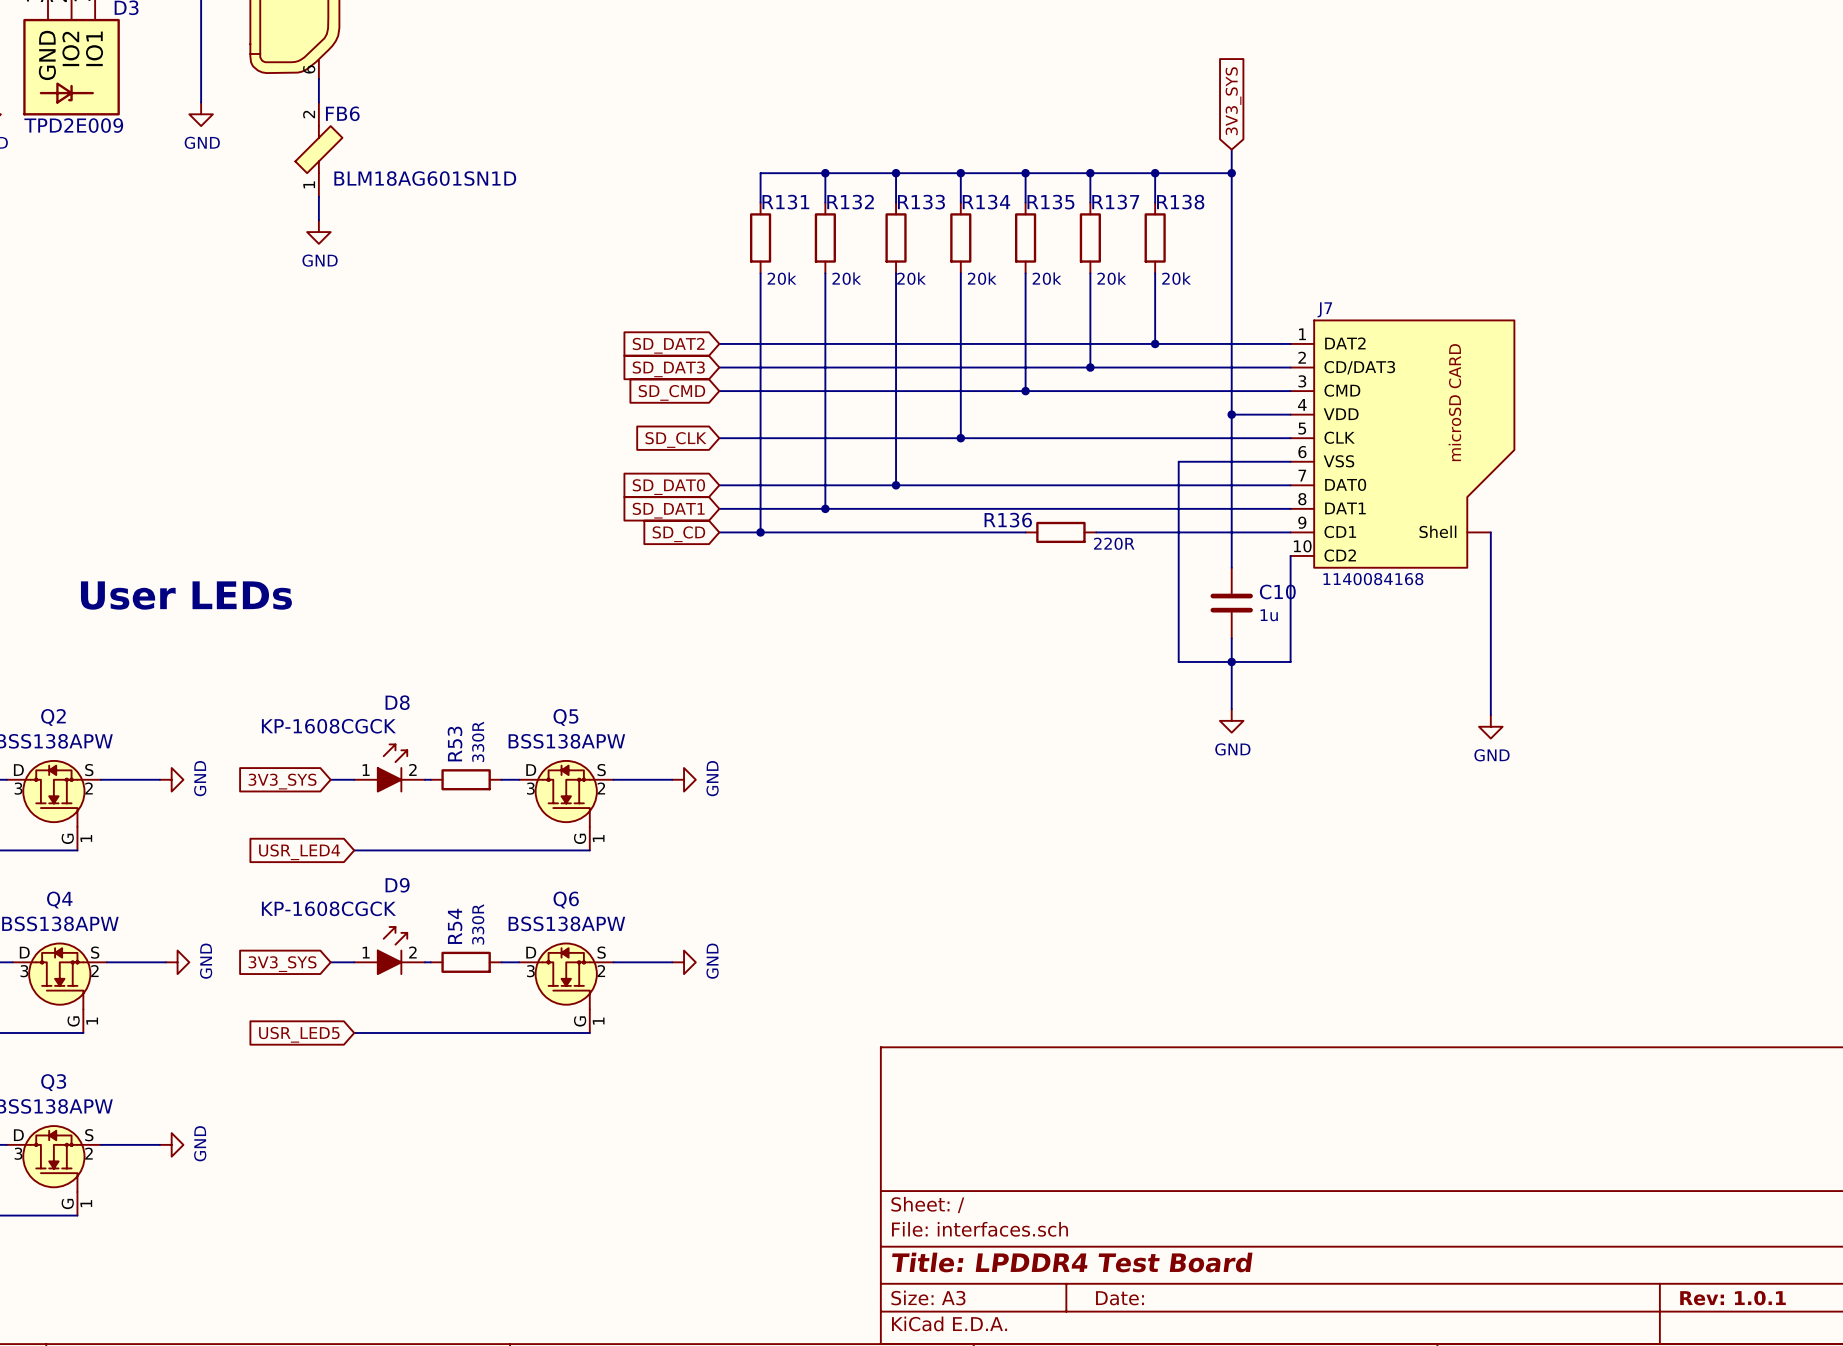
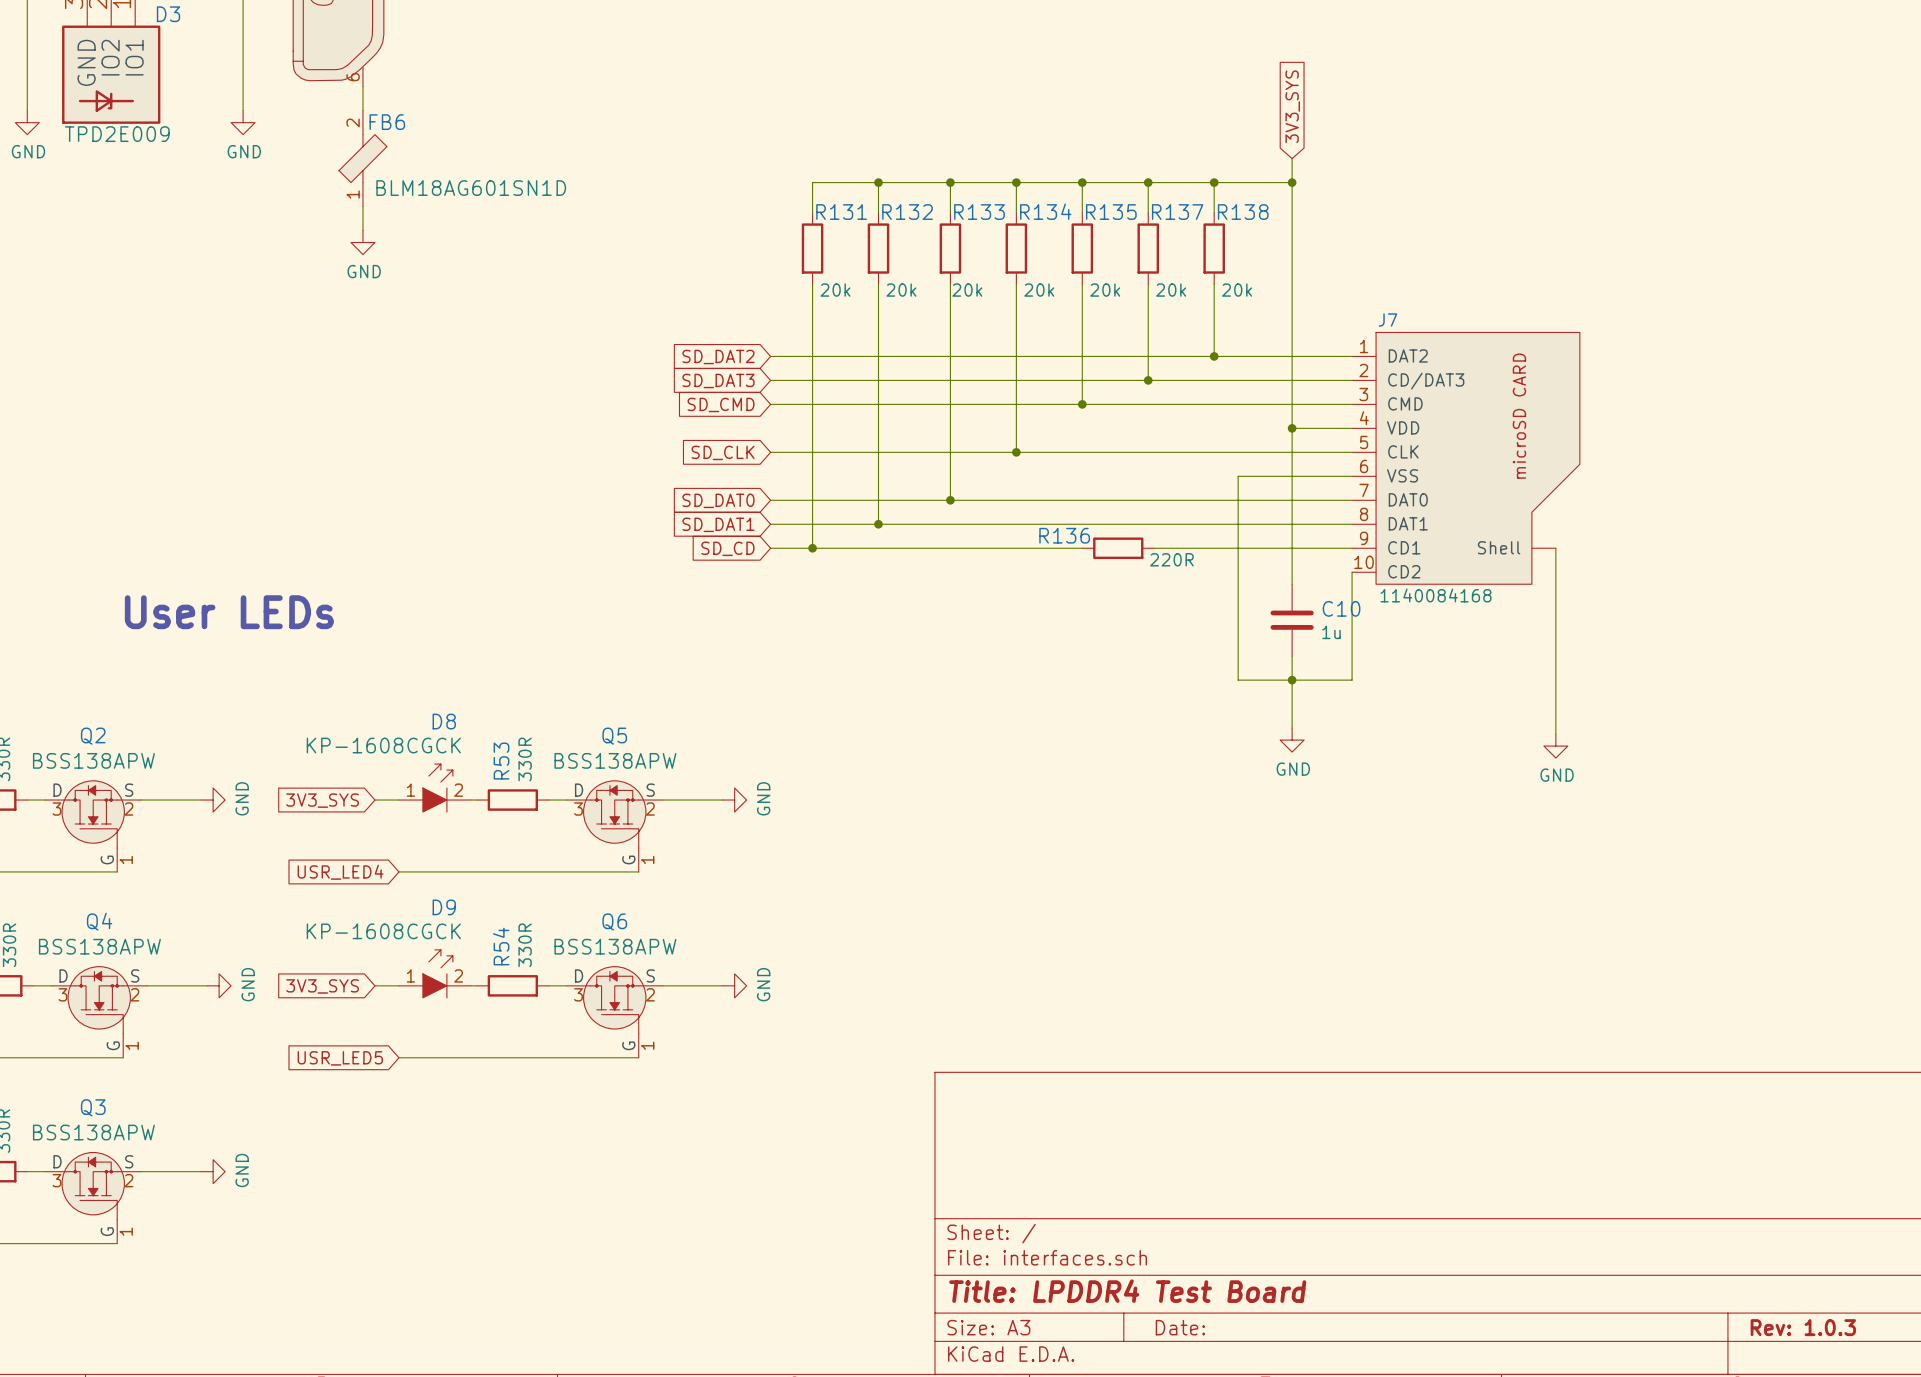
title block: Rev: 1.0.1 (1732, 1298) -> Rev: 1.0.3 (1803, 1327)

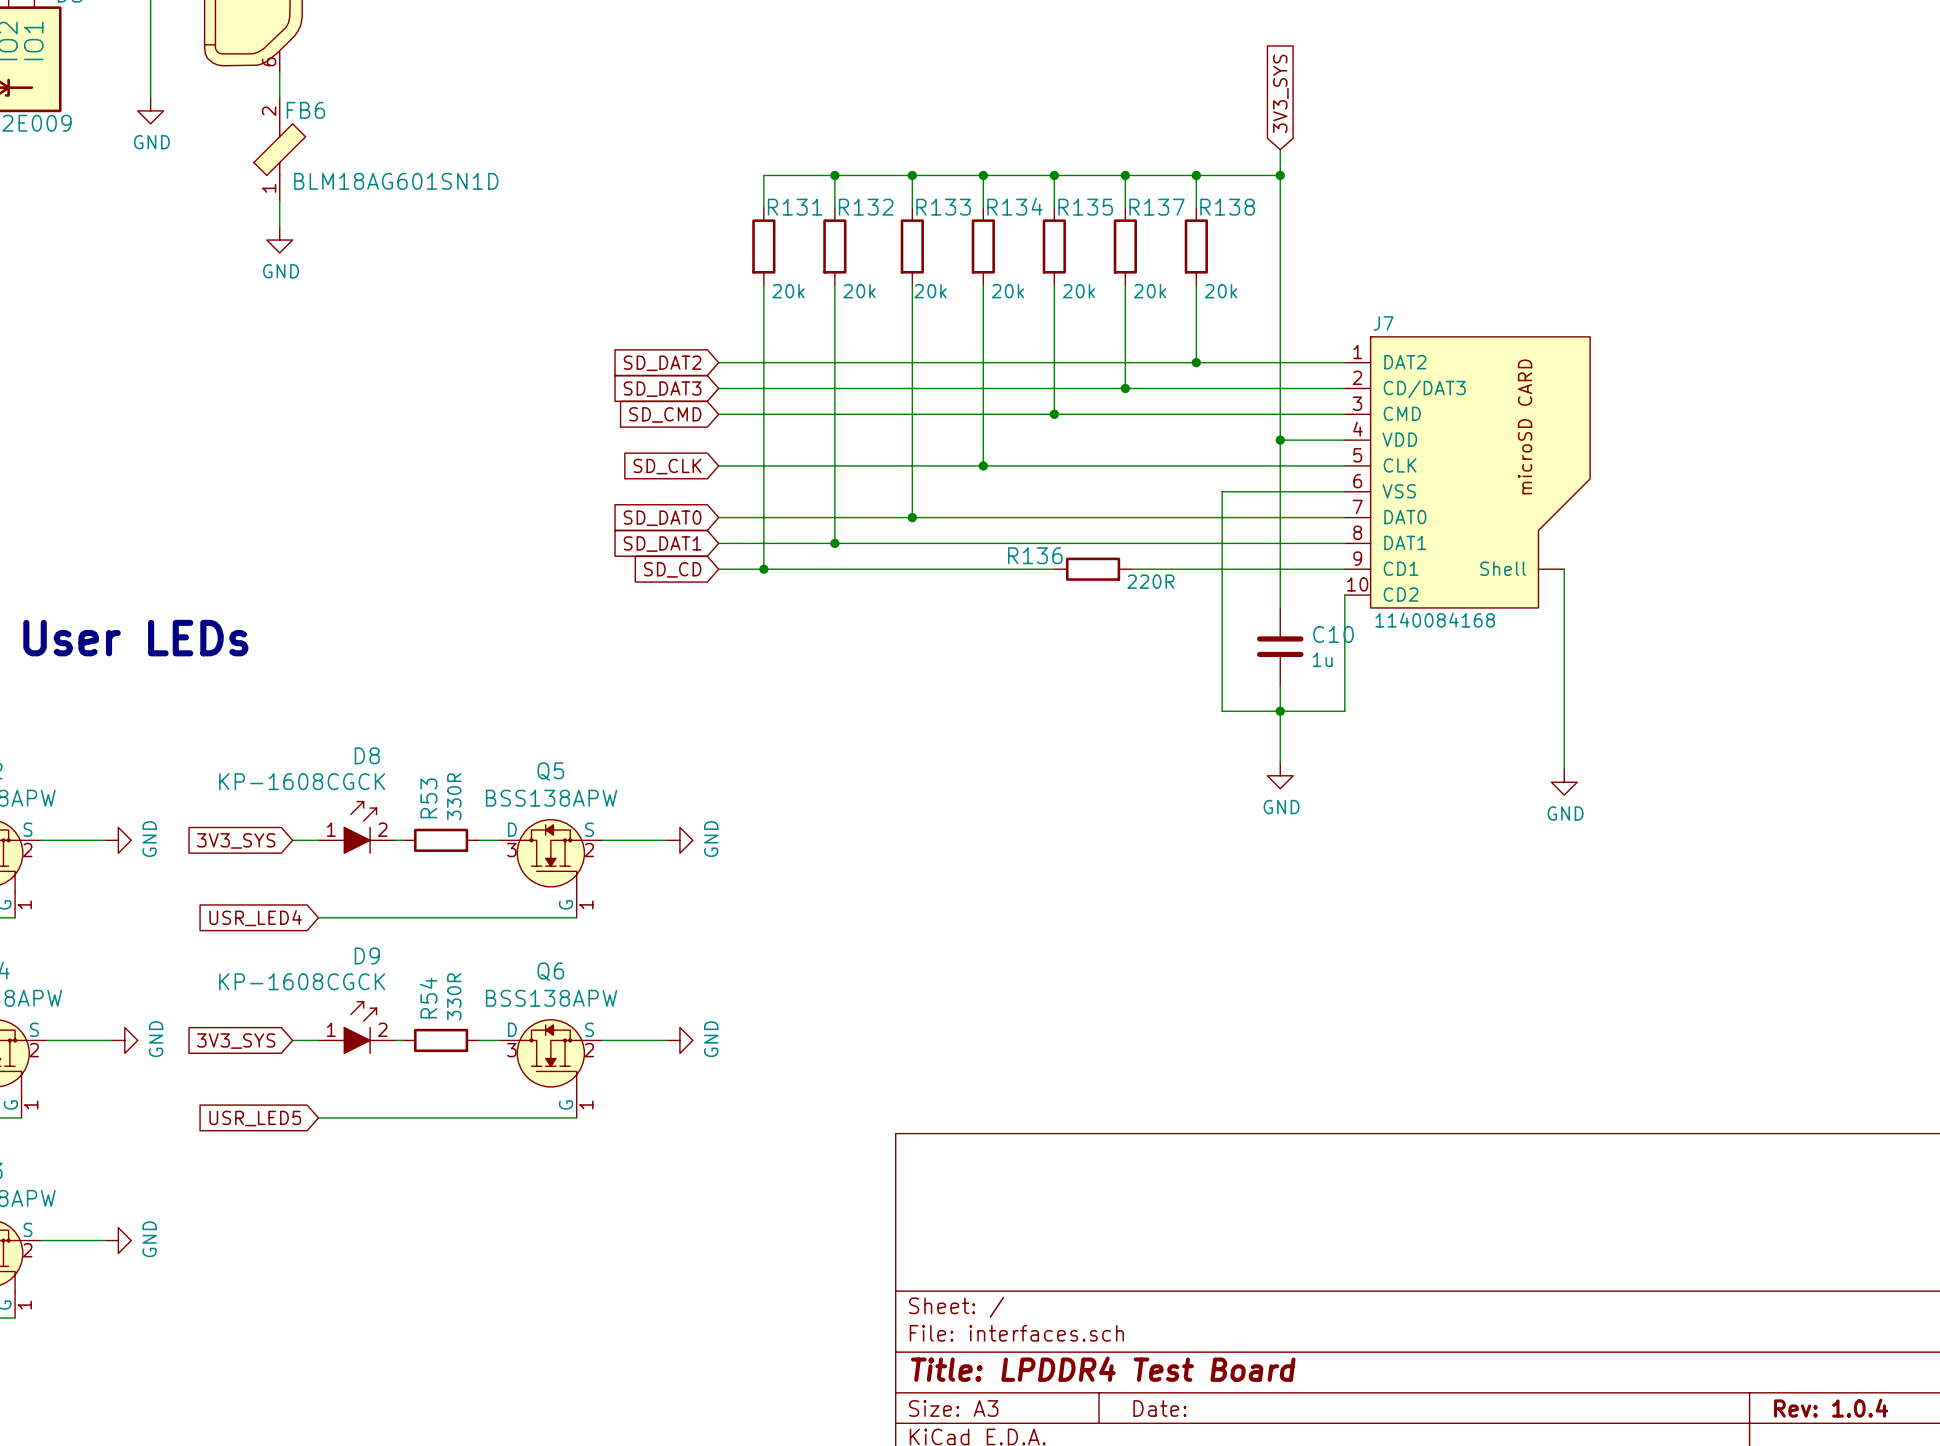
title block: Rev: 1.0.3 (1803, 1327) -> Rev: 1.0.4 (1831, 1408)

